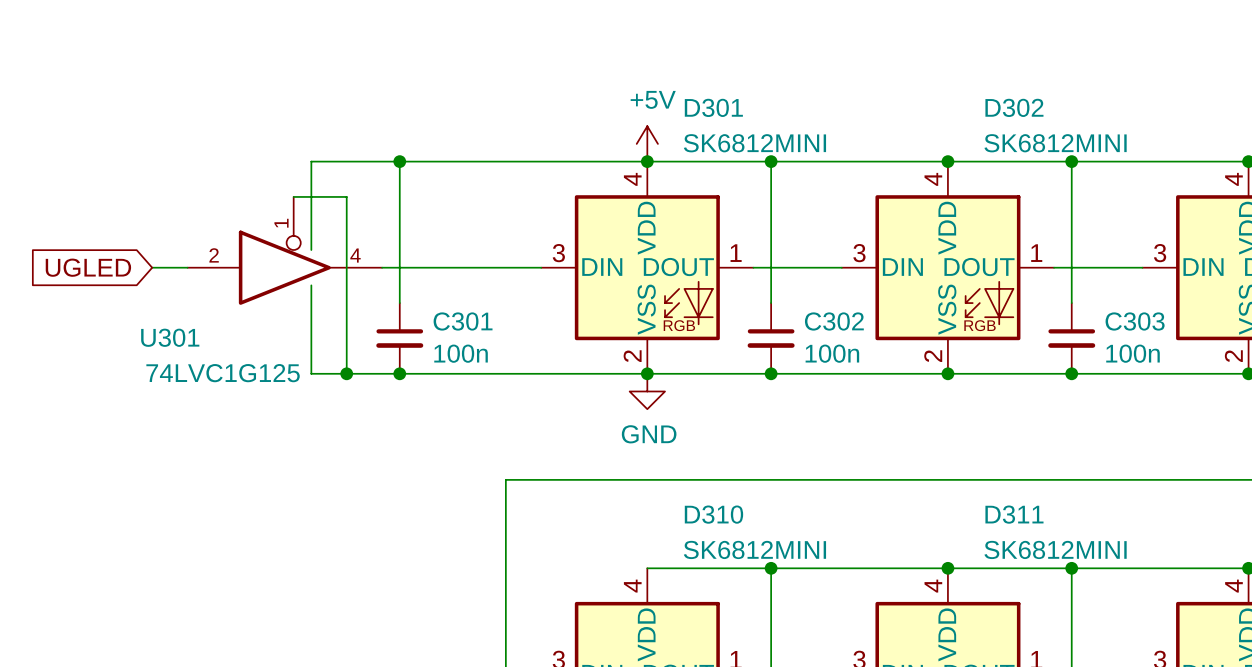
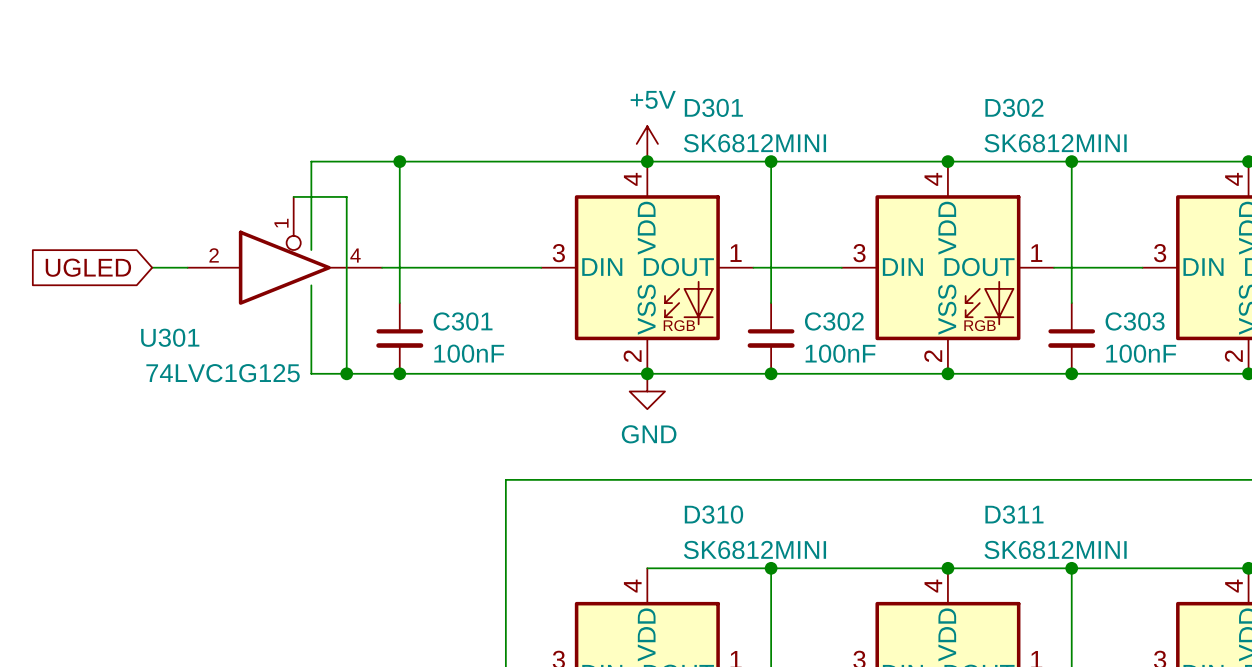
C301 value: 100n (461, 353) -> 100nF (469, 353)
C302 value: 100n (832, 353) -> 100nF (840, 353)
C303 value: 100n (1133, 353) -> 100nF (1141, 353)

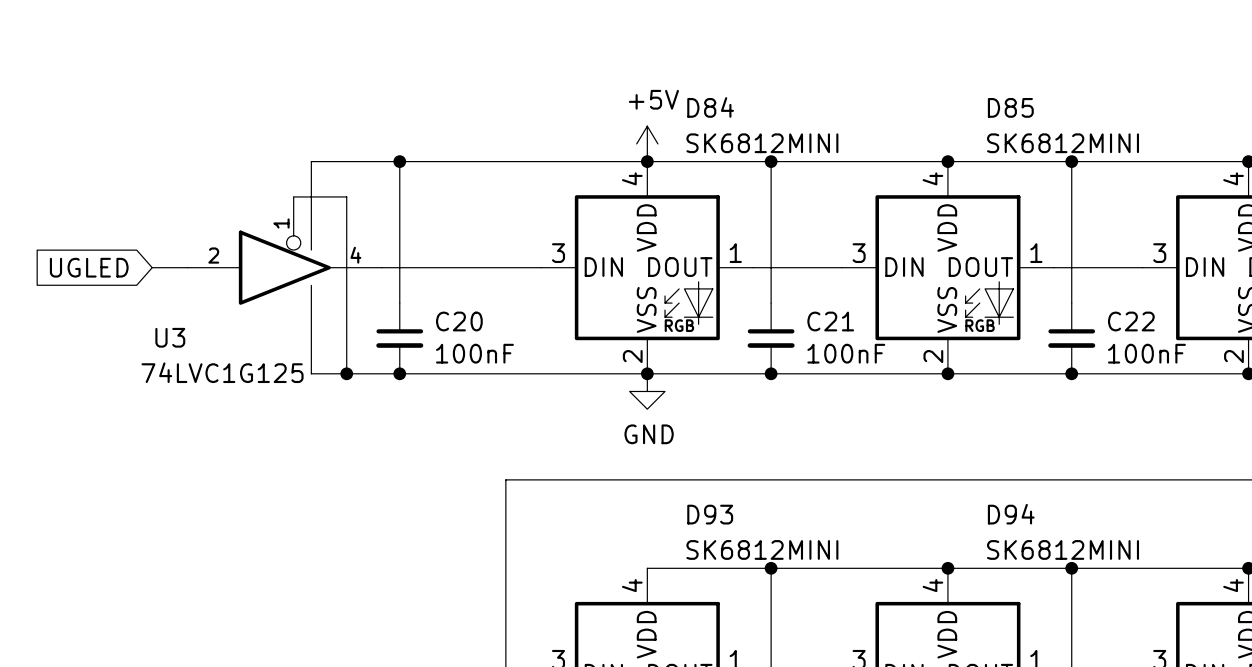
D301 name: D301 (713, 107) -> D84 (710, 107)
D302 name: D302 (1014, 107) -> D85 (1010, 107)
C301 name: C301 (463, 321) -> C20 (459, 321)
C302 name: C302 (834, 321) -> C21 (830, 321)
C303 name: C303 (1135, 321) -> C22 (1131, 321)
U301 name: U301 (170, 337) -> U3 (170, 337)
D310 name: D310 (713, 514) -> D93 (710, 514)
D311 name: D311 (1014, 514) -> D94 (1011, 514)

